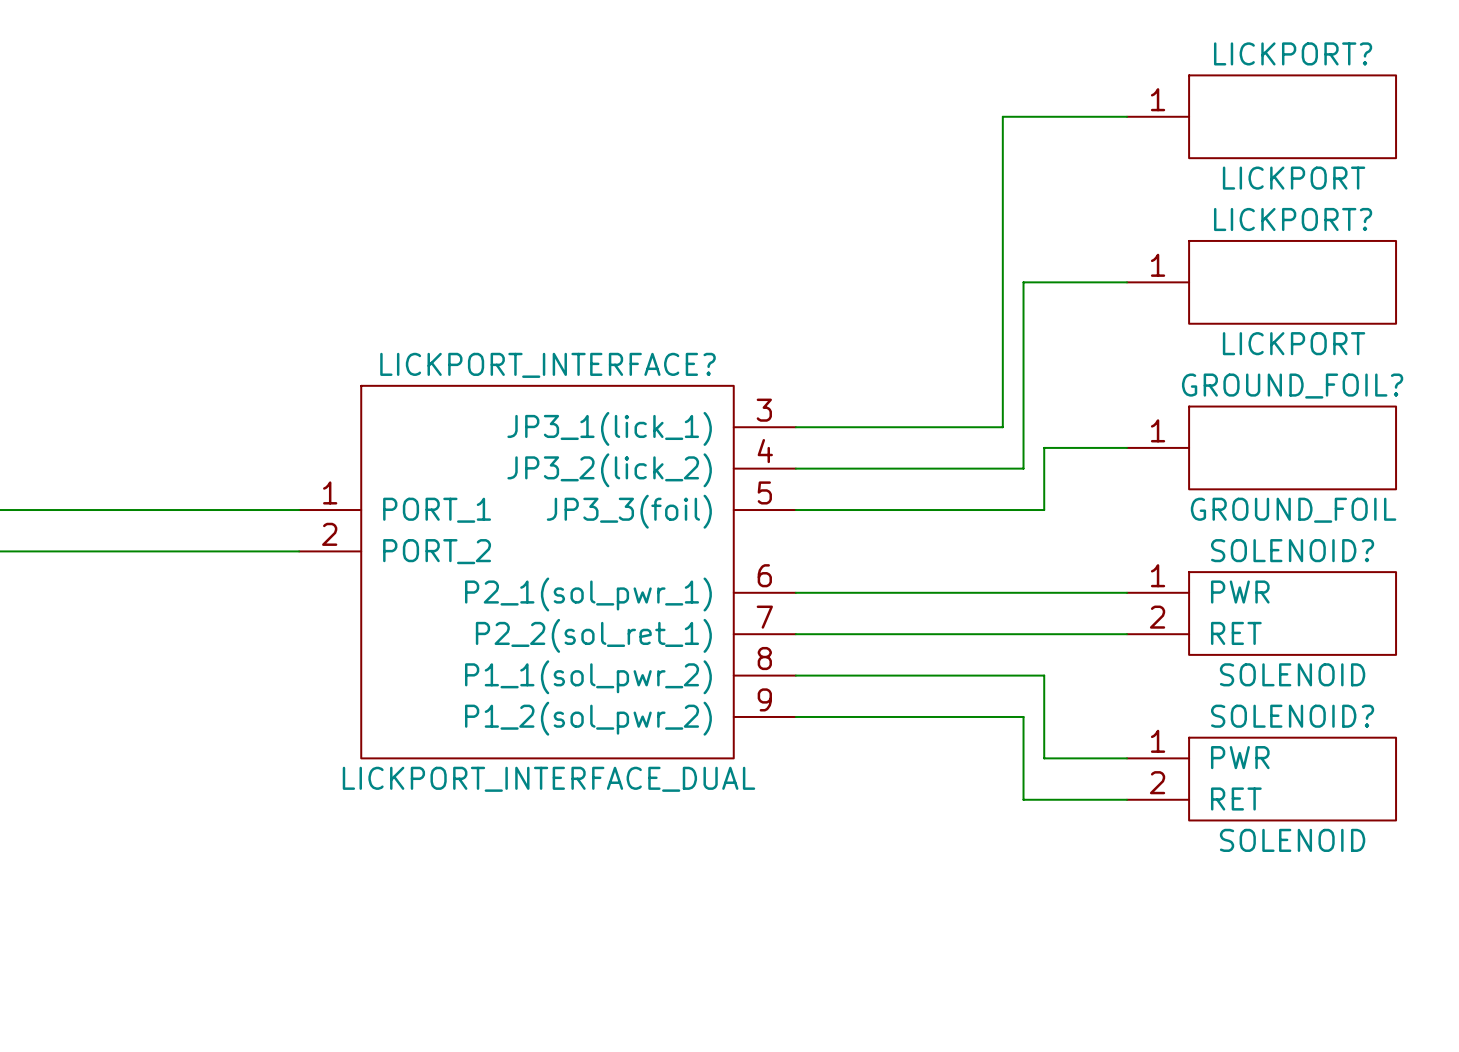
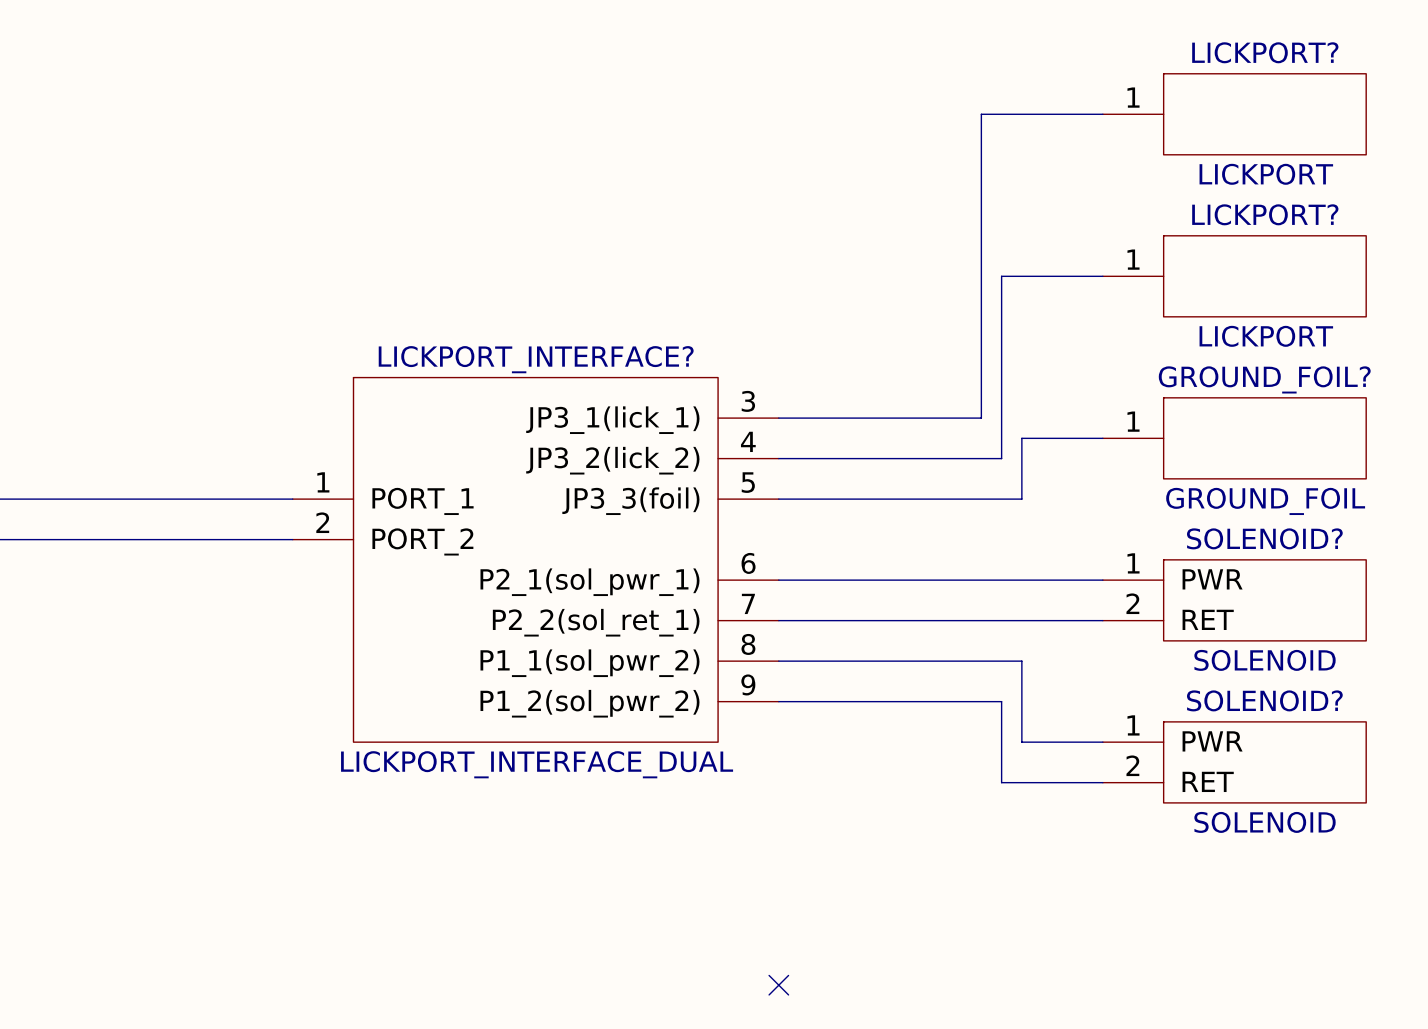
no-connect mark: none -> (778, 985)

